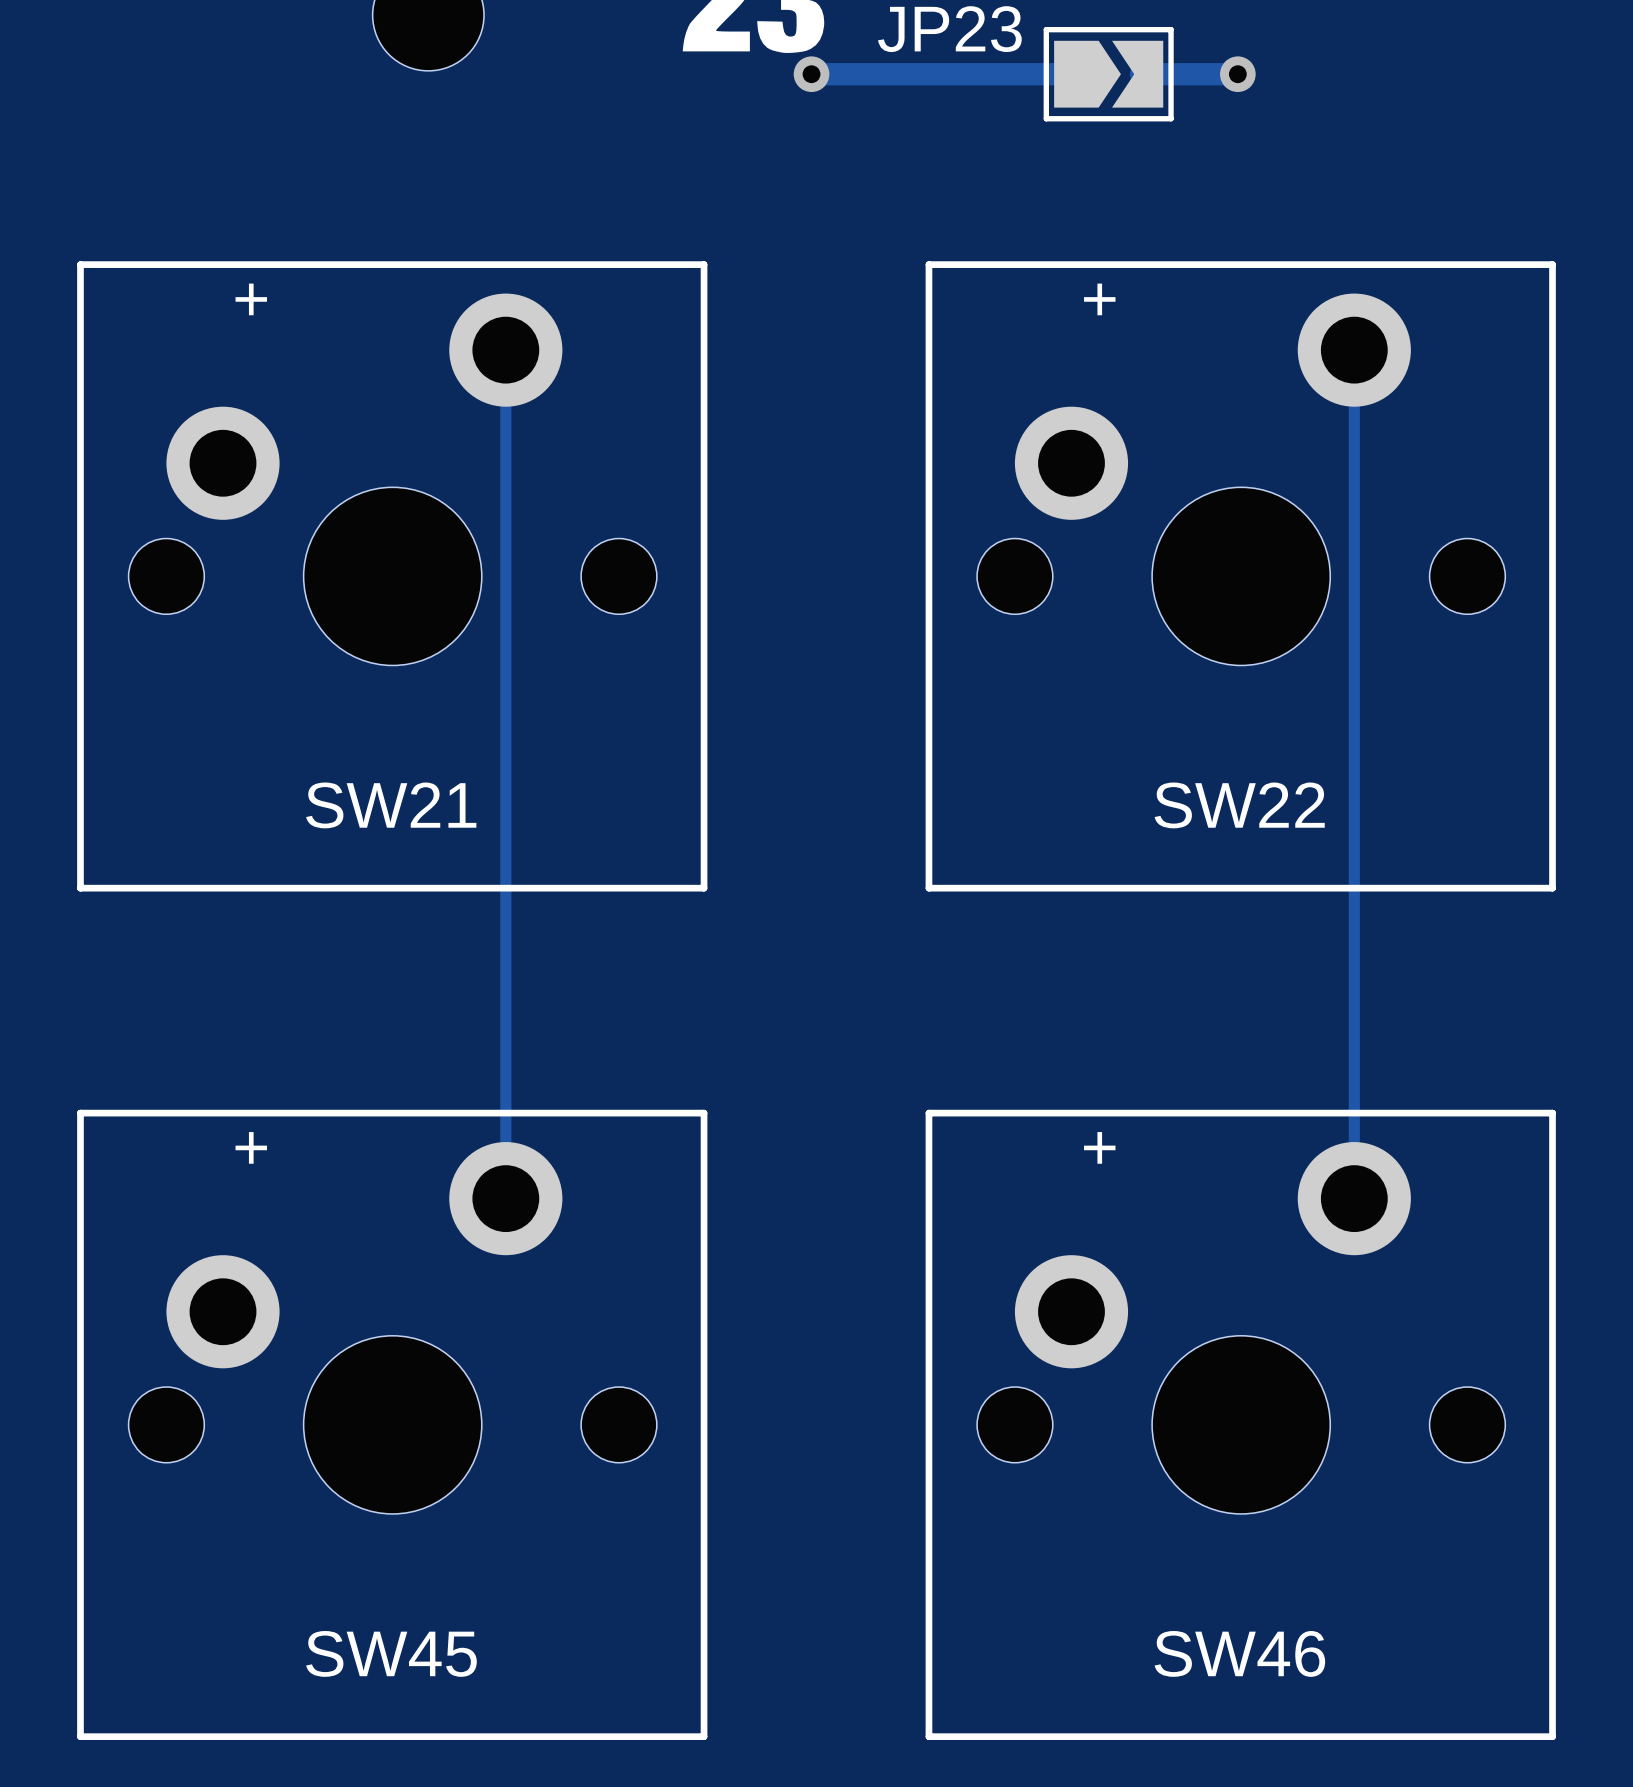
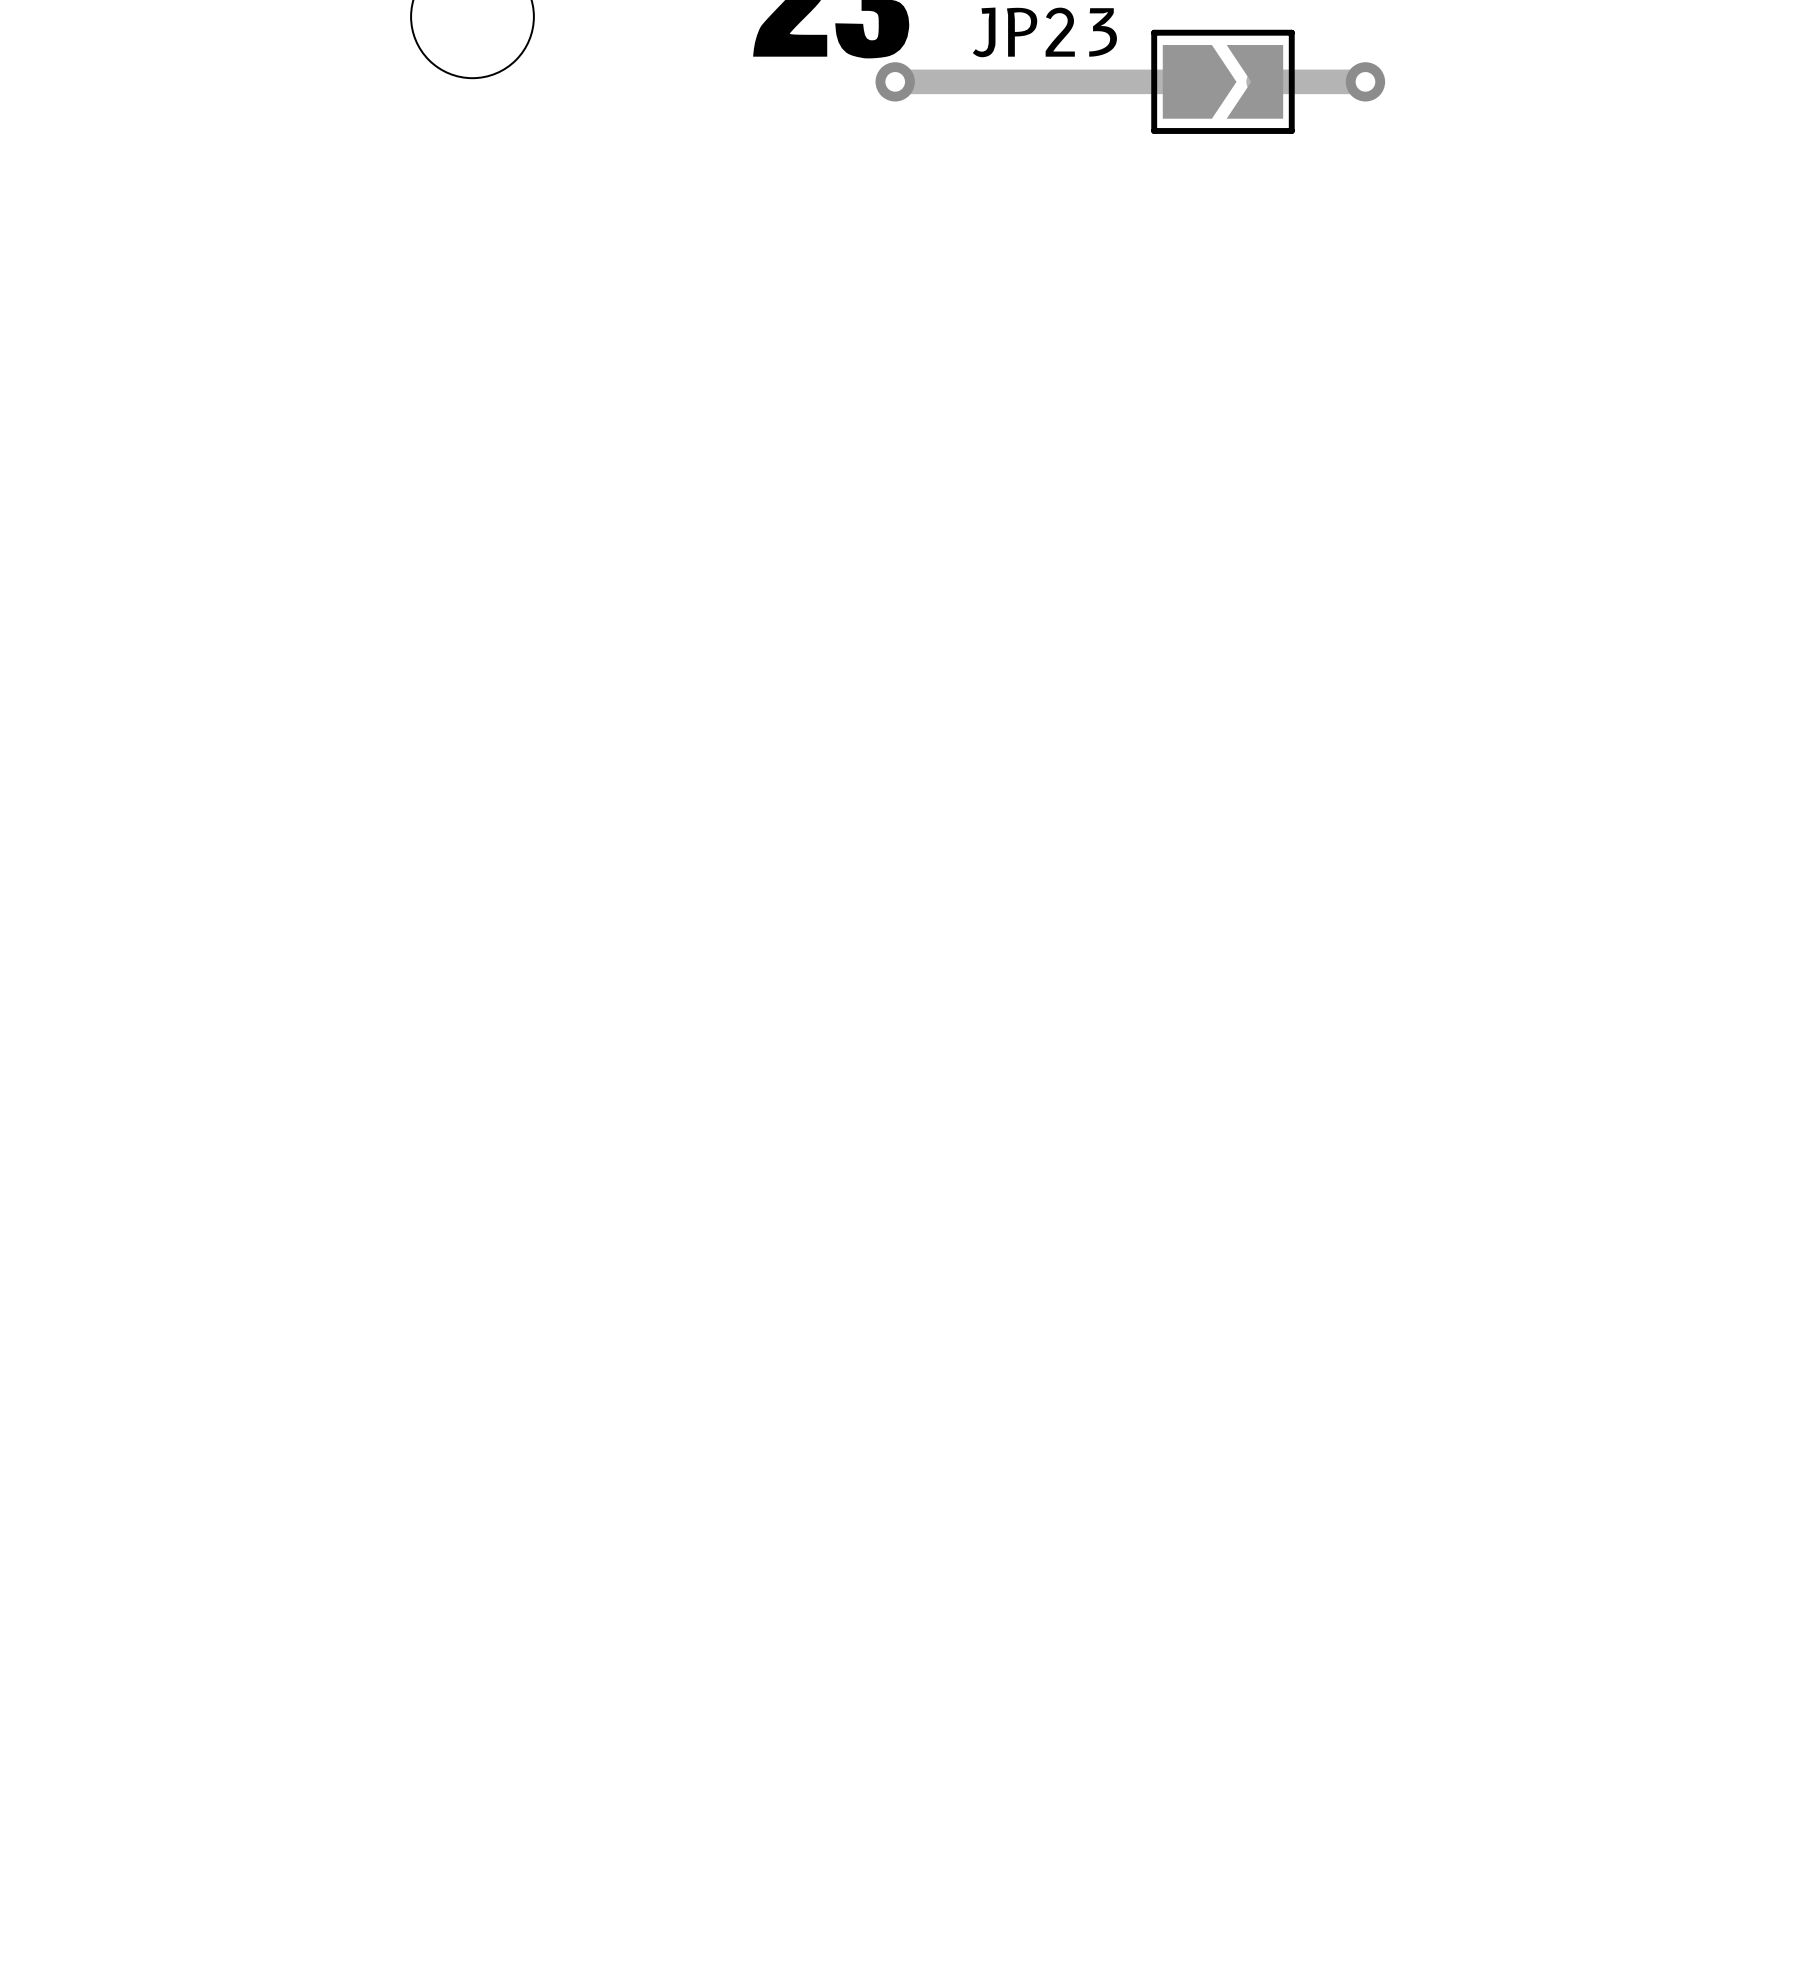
track: (505, 350) (505, 1198) -> none
track: (1354, 350) (1354, 1198) -> none
SW21: (392, 576) -> none
SW22: (1240, 576) -> none
SW45: (392, 1424) -> none
SW46: (1240, 1424) -> none

